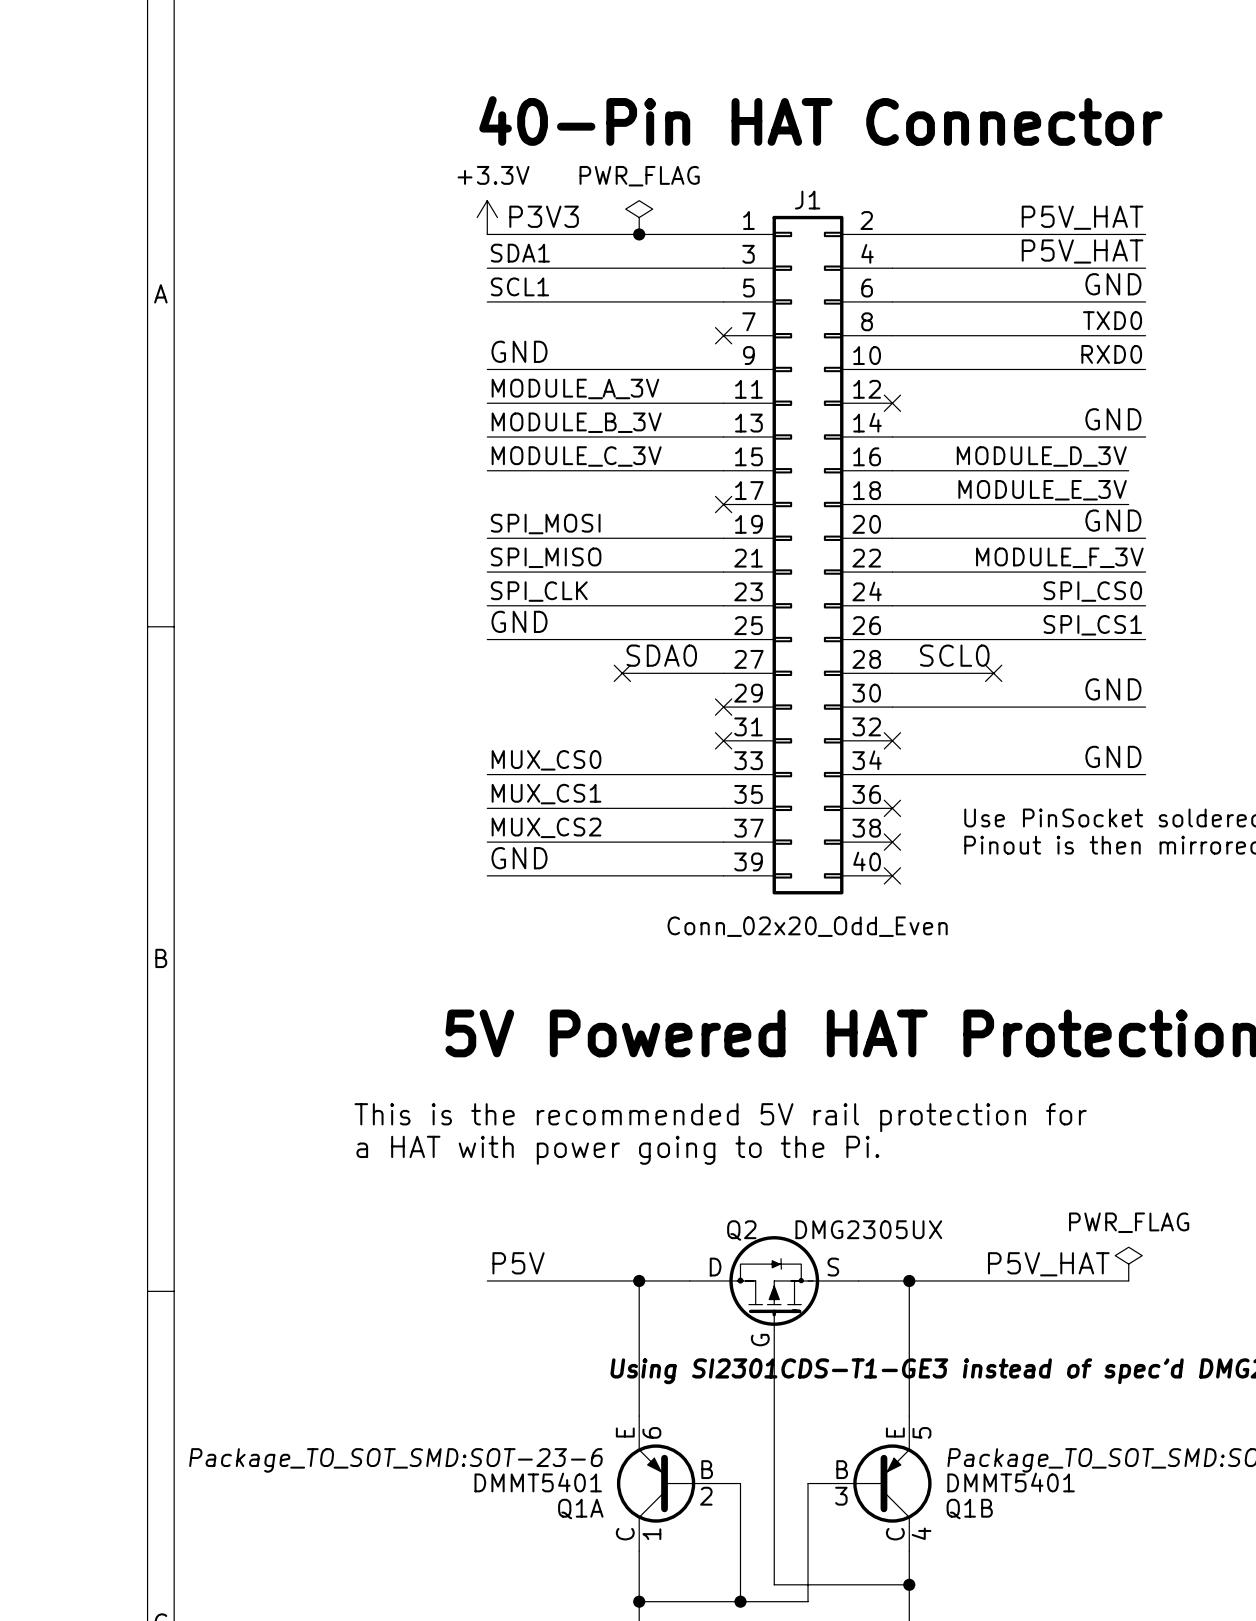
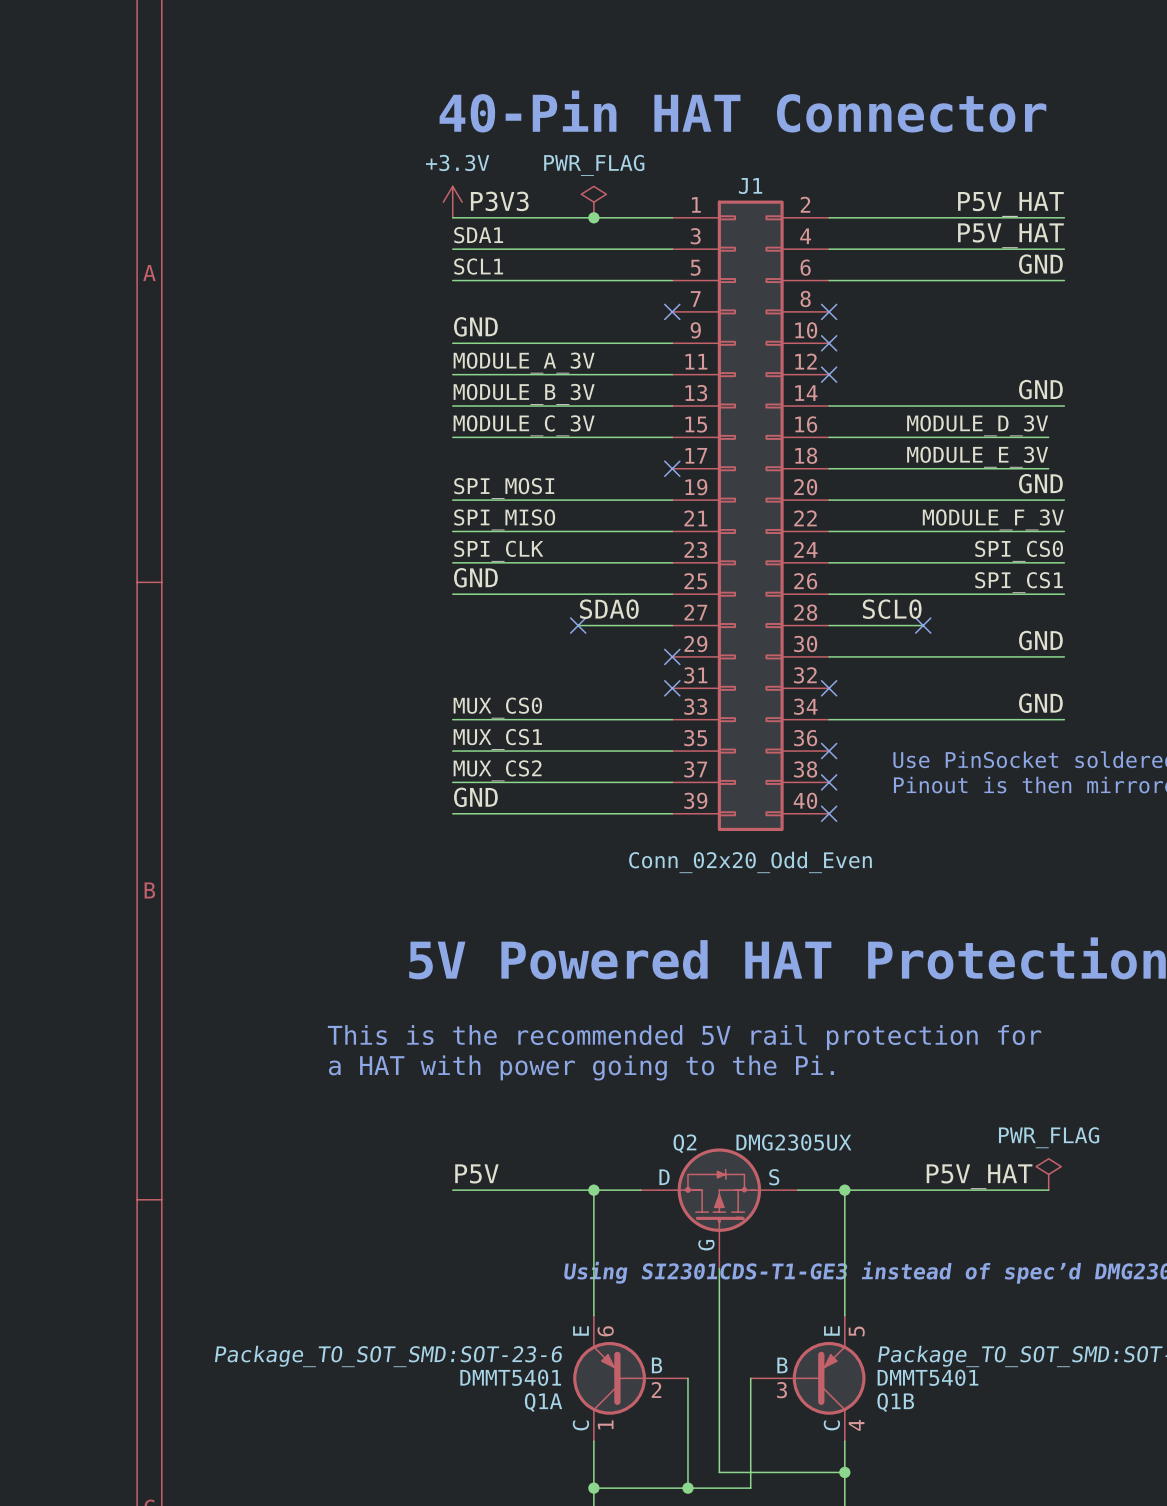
label: TXD0 (1112, 320) -> none
wire: (892, 335) (1145, 335) -> none
no-connect mark: none -> (829, 311)
label: RXD0 (1111, 354) -> none
wire: (892, 369) (1145, 369) -> none
no-connect mark: none -> (829, 343)

